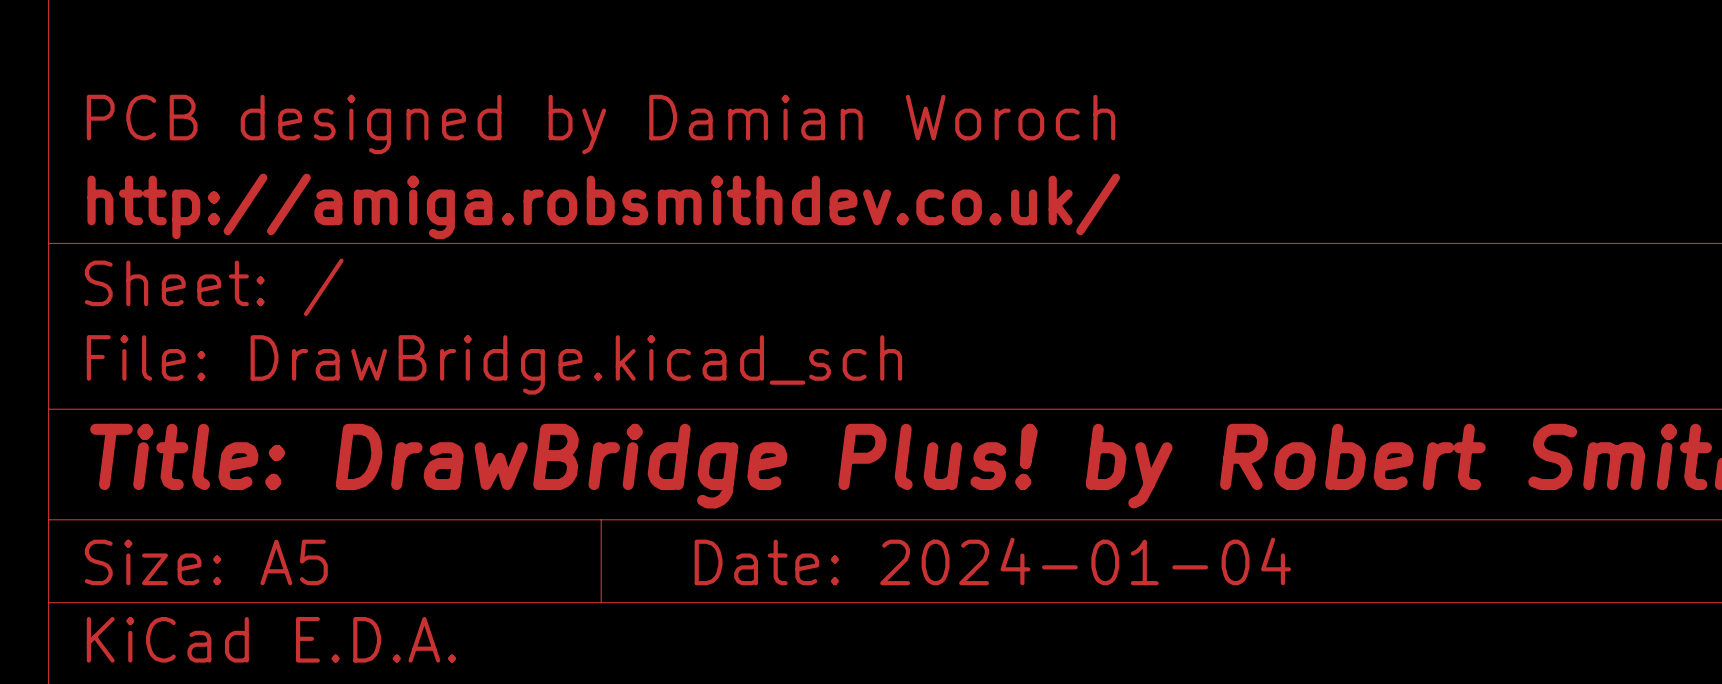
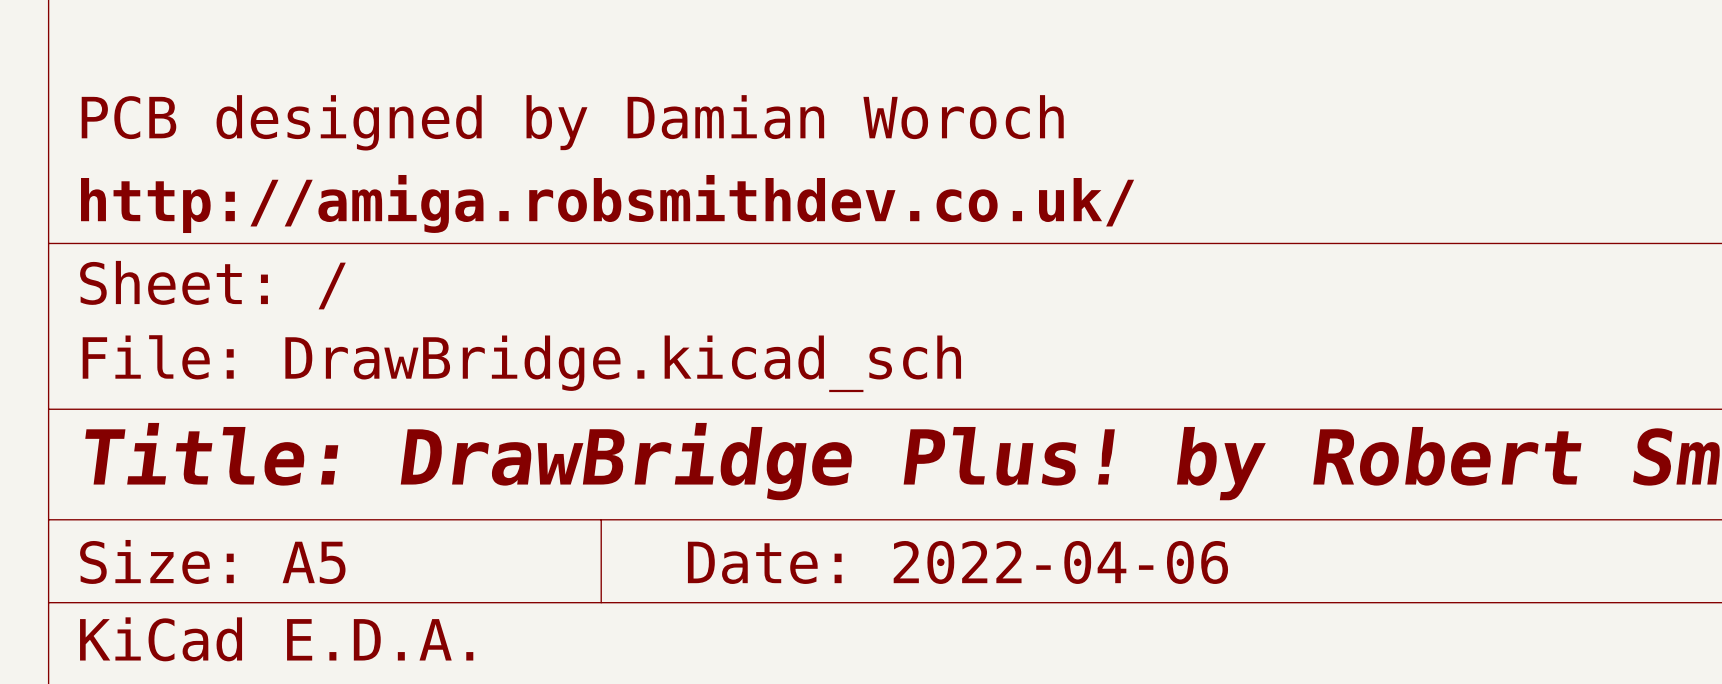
title block: Date: 2024-01-04 (992, 561) -> Date: 2022-04-06 (957, 562)

